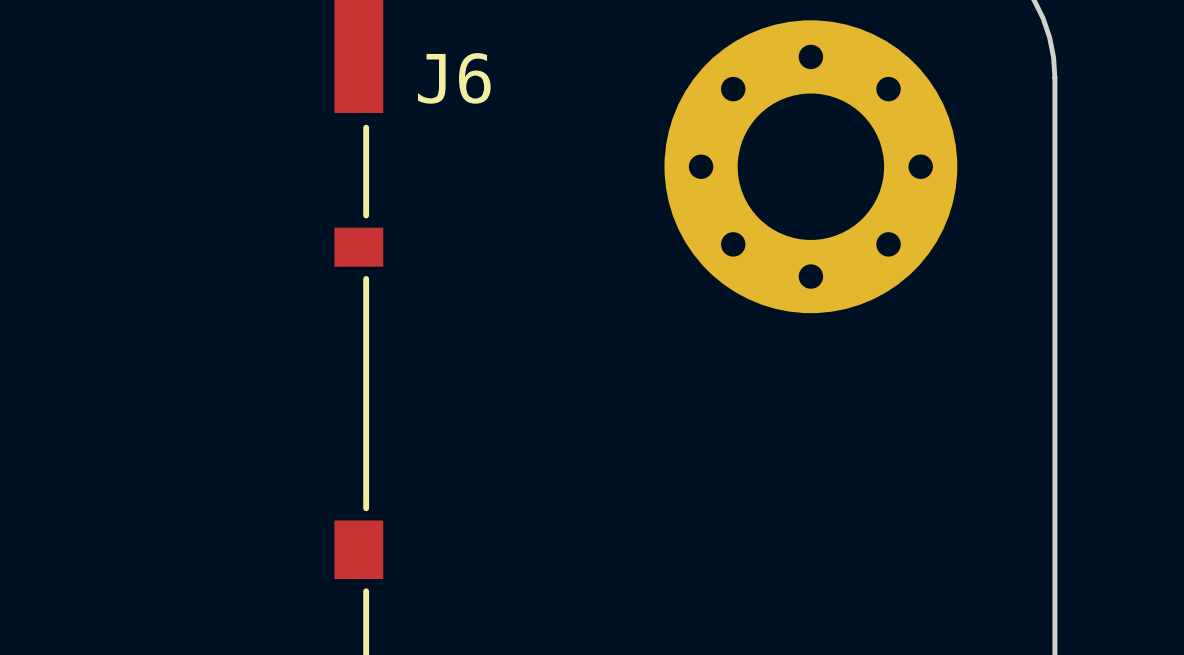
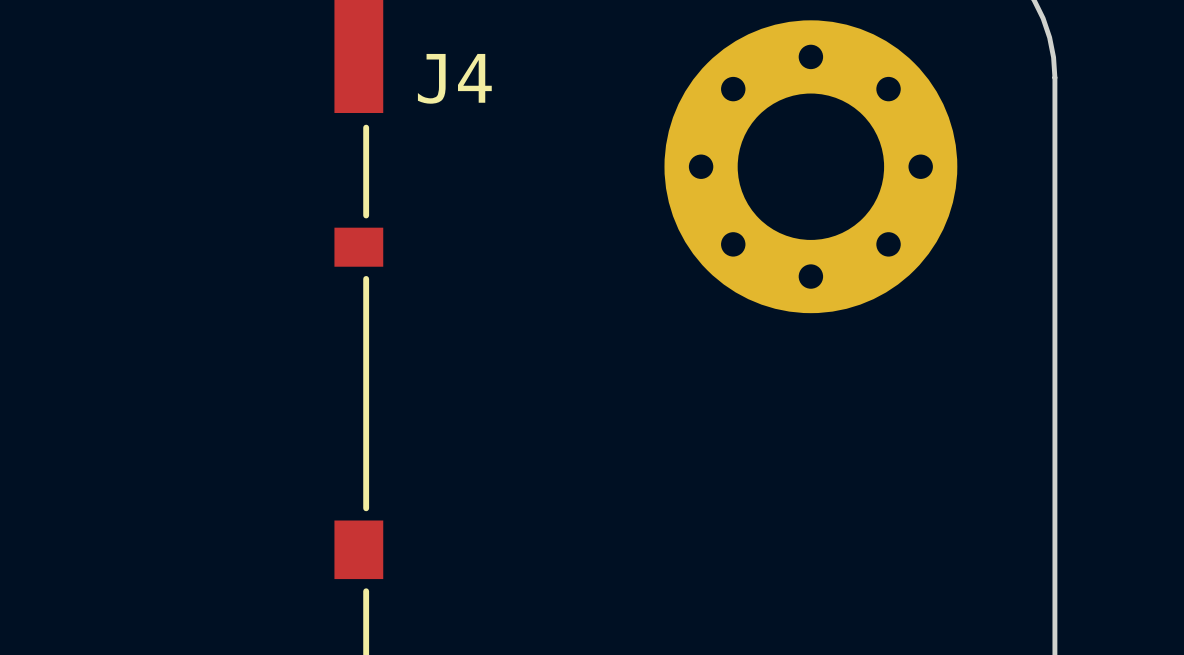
J6 name: J6 (454, 78) -> J4 (454, 78)

